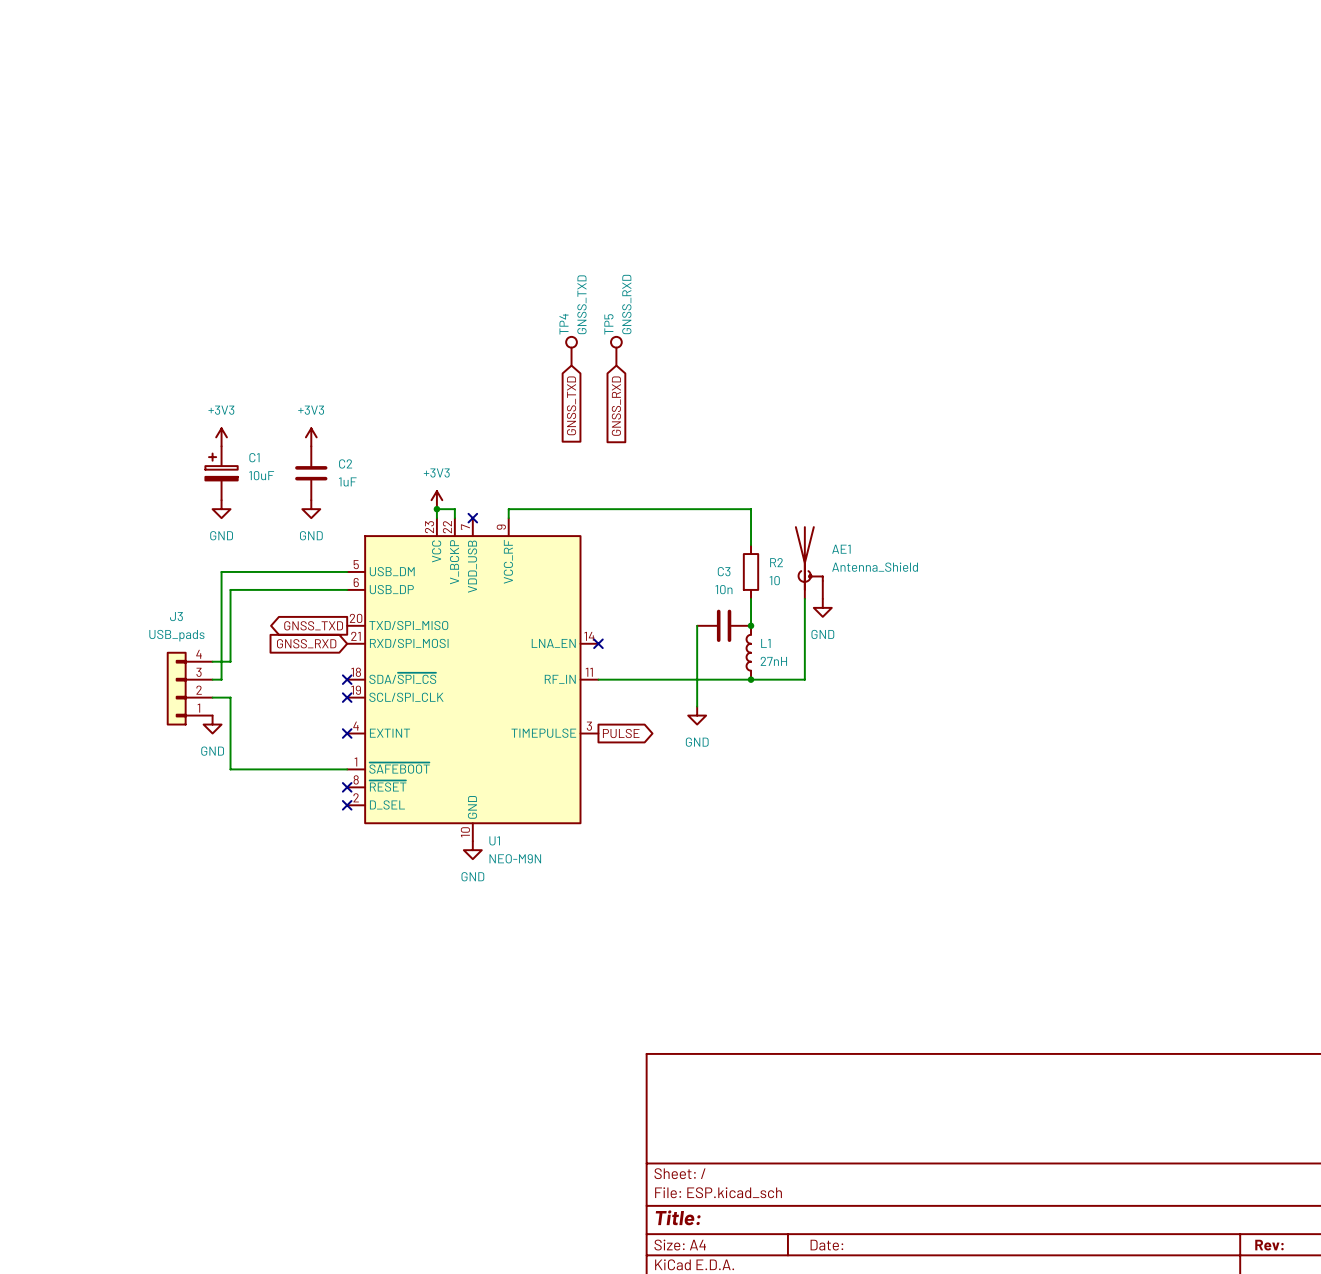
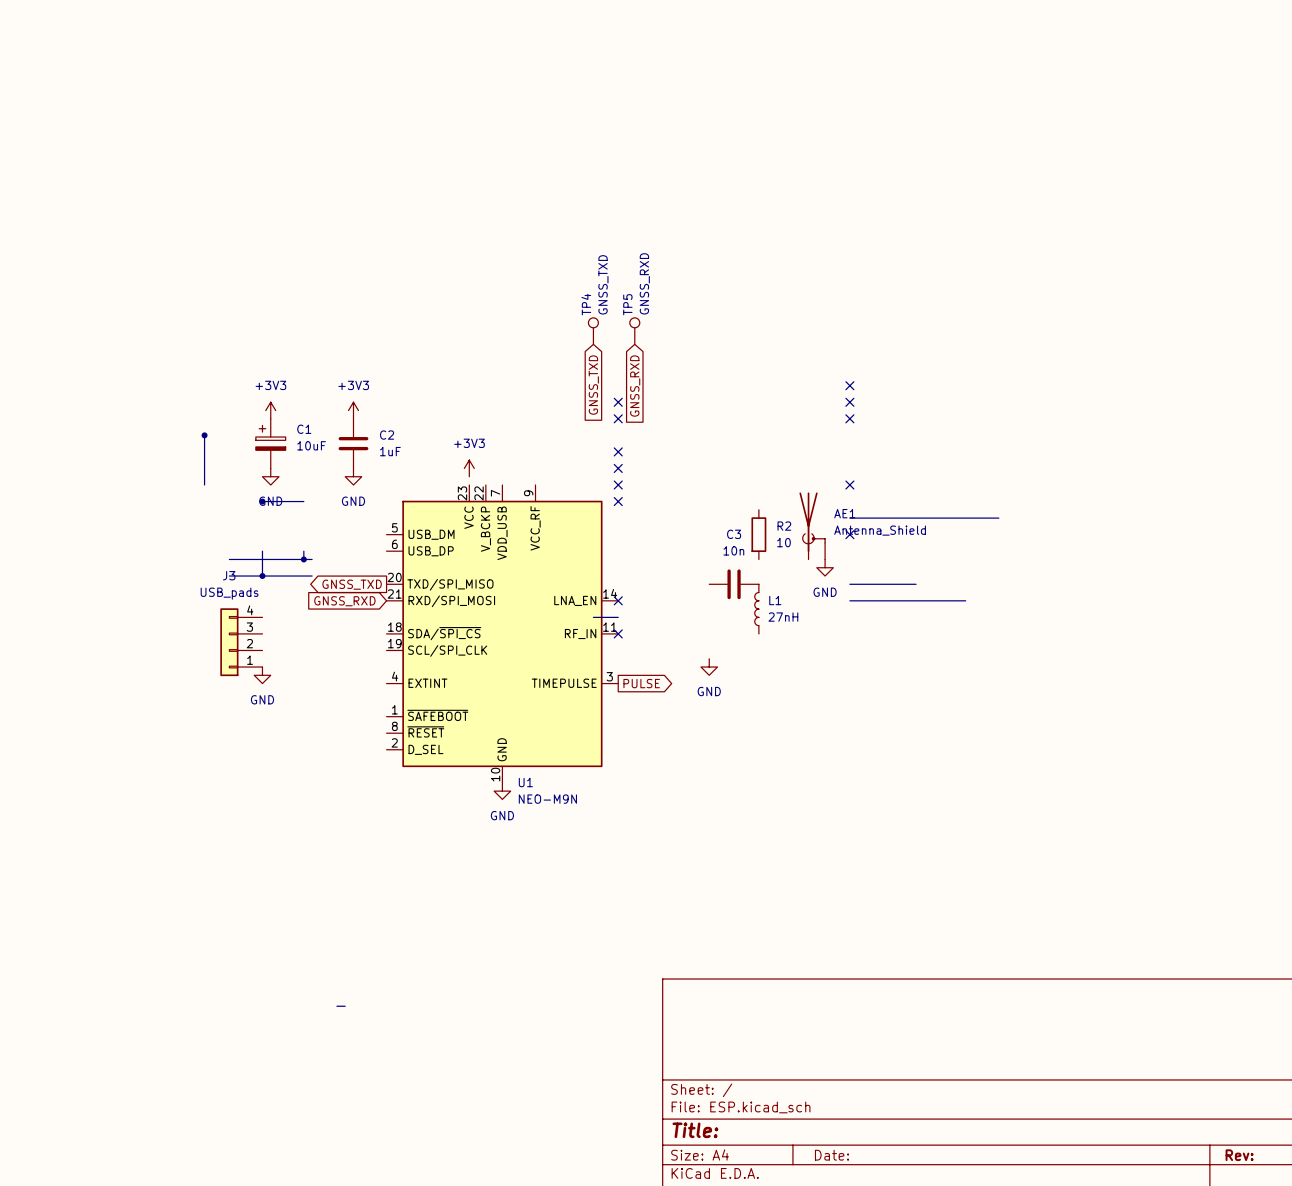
no-connect mark: none -> (849, 385)
no-connect mark: none -> (618, 402)
no-connect mark: none -> (849, 402)
no-connect mark: none -> (618, 418)
no-connect mark: none -> (849, 418)
wire: none -> (204, 435) (204, 485)
junction: none -> (204, 435)
no-connect mark: none -> (618, 451)
no-connect mark: none -> (618, 468)
junction: (436, 509) -> none
wire: (436, 518) (436, 509) (454, 509) (454, 518) -> none
no-connect mark: (472, 518) -> none
wire: (508, 518) (508, 509) (751, 509) (751, 545) -> none
no-connect mark: none -> (618, 485)
no-connect mark: none -> (849, 485)
wire: none -> (262, 501) (303, 501)
junction: none -> (262, 501)
no-connect mark: none -> (618, 501)
wire: none -> (849, 518) (998, 518)
wire: (347, 571) (221, 571) (221, 679) (212, 679) -> none
no-connect mark: none -> (849, 534)
wire: none -> (262, 551) (262, 576)
wire: none -> (303, 551) (303, 559)
wire: (347, 589) (230, 589) (230, 661) (212, 661) -> none
wire: none -> (229, 559) (312, 559)
junction: none -> (303, 559)
wire: (751, 598) (751, 625) -> none
wire: (804, 598) (804, 679) (598, 679) -> none
wire: none -> (229, 576) (312, 576)
junction: none -> (262, 576)
wire: (697, 625) (697, 706) -> none
junction: (751, 625) -> none
wire: none -> (849, 584) (916, 584)
wire: none -> (849, 600) (965, 600)
wire: none -> (593, 617) (618, 617)
no-connect mark: (347, 679) -> none
no-connect mark: none -> (618, 633)
junction: (751, 679) -> none
wire: (212, 697) (230, 697) (230, 769) (347, 769) -> none
no-connect mark: (347, 697) -> none
no-connect mark: (347, 733) -> none
no-connect mark: (347, 787) -> none
no-connect mark: (347, 805) -> none
wire: none -> (336, 1006) (345, 1006)

